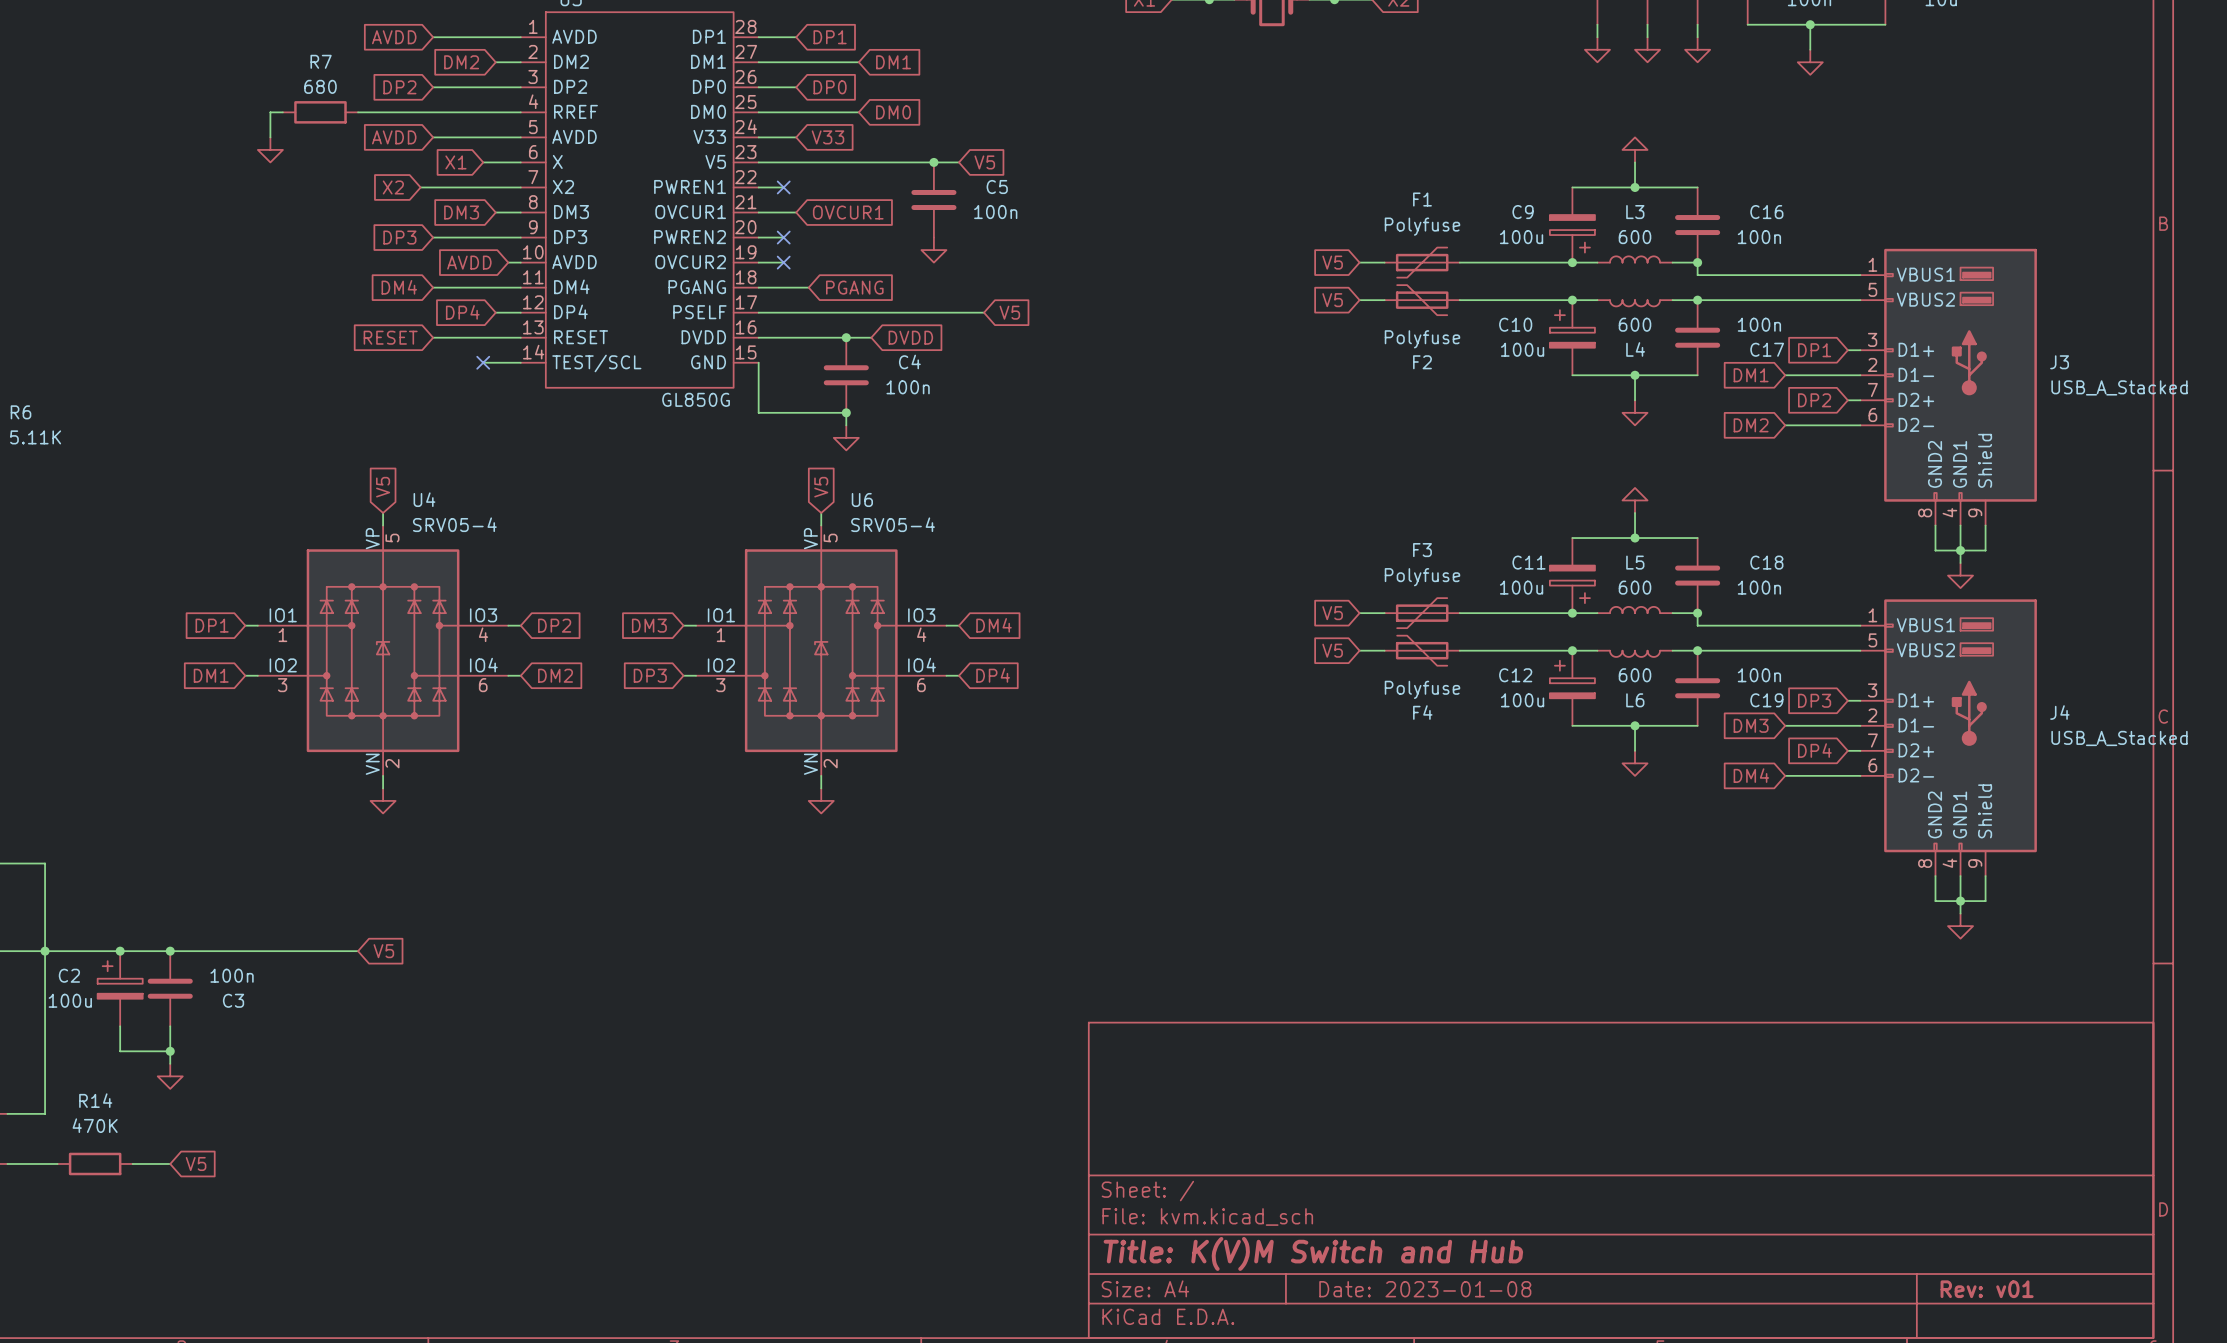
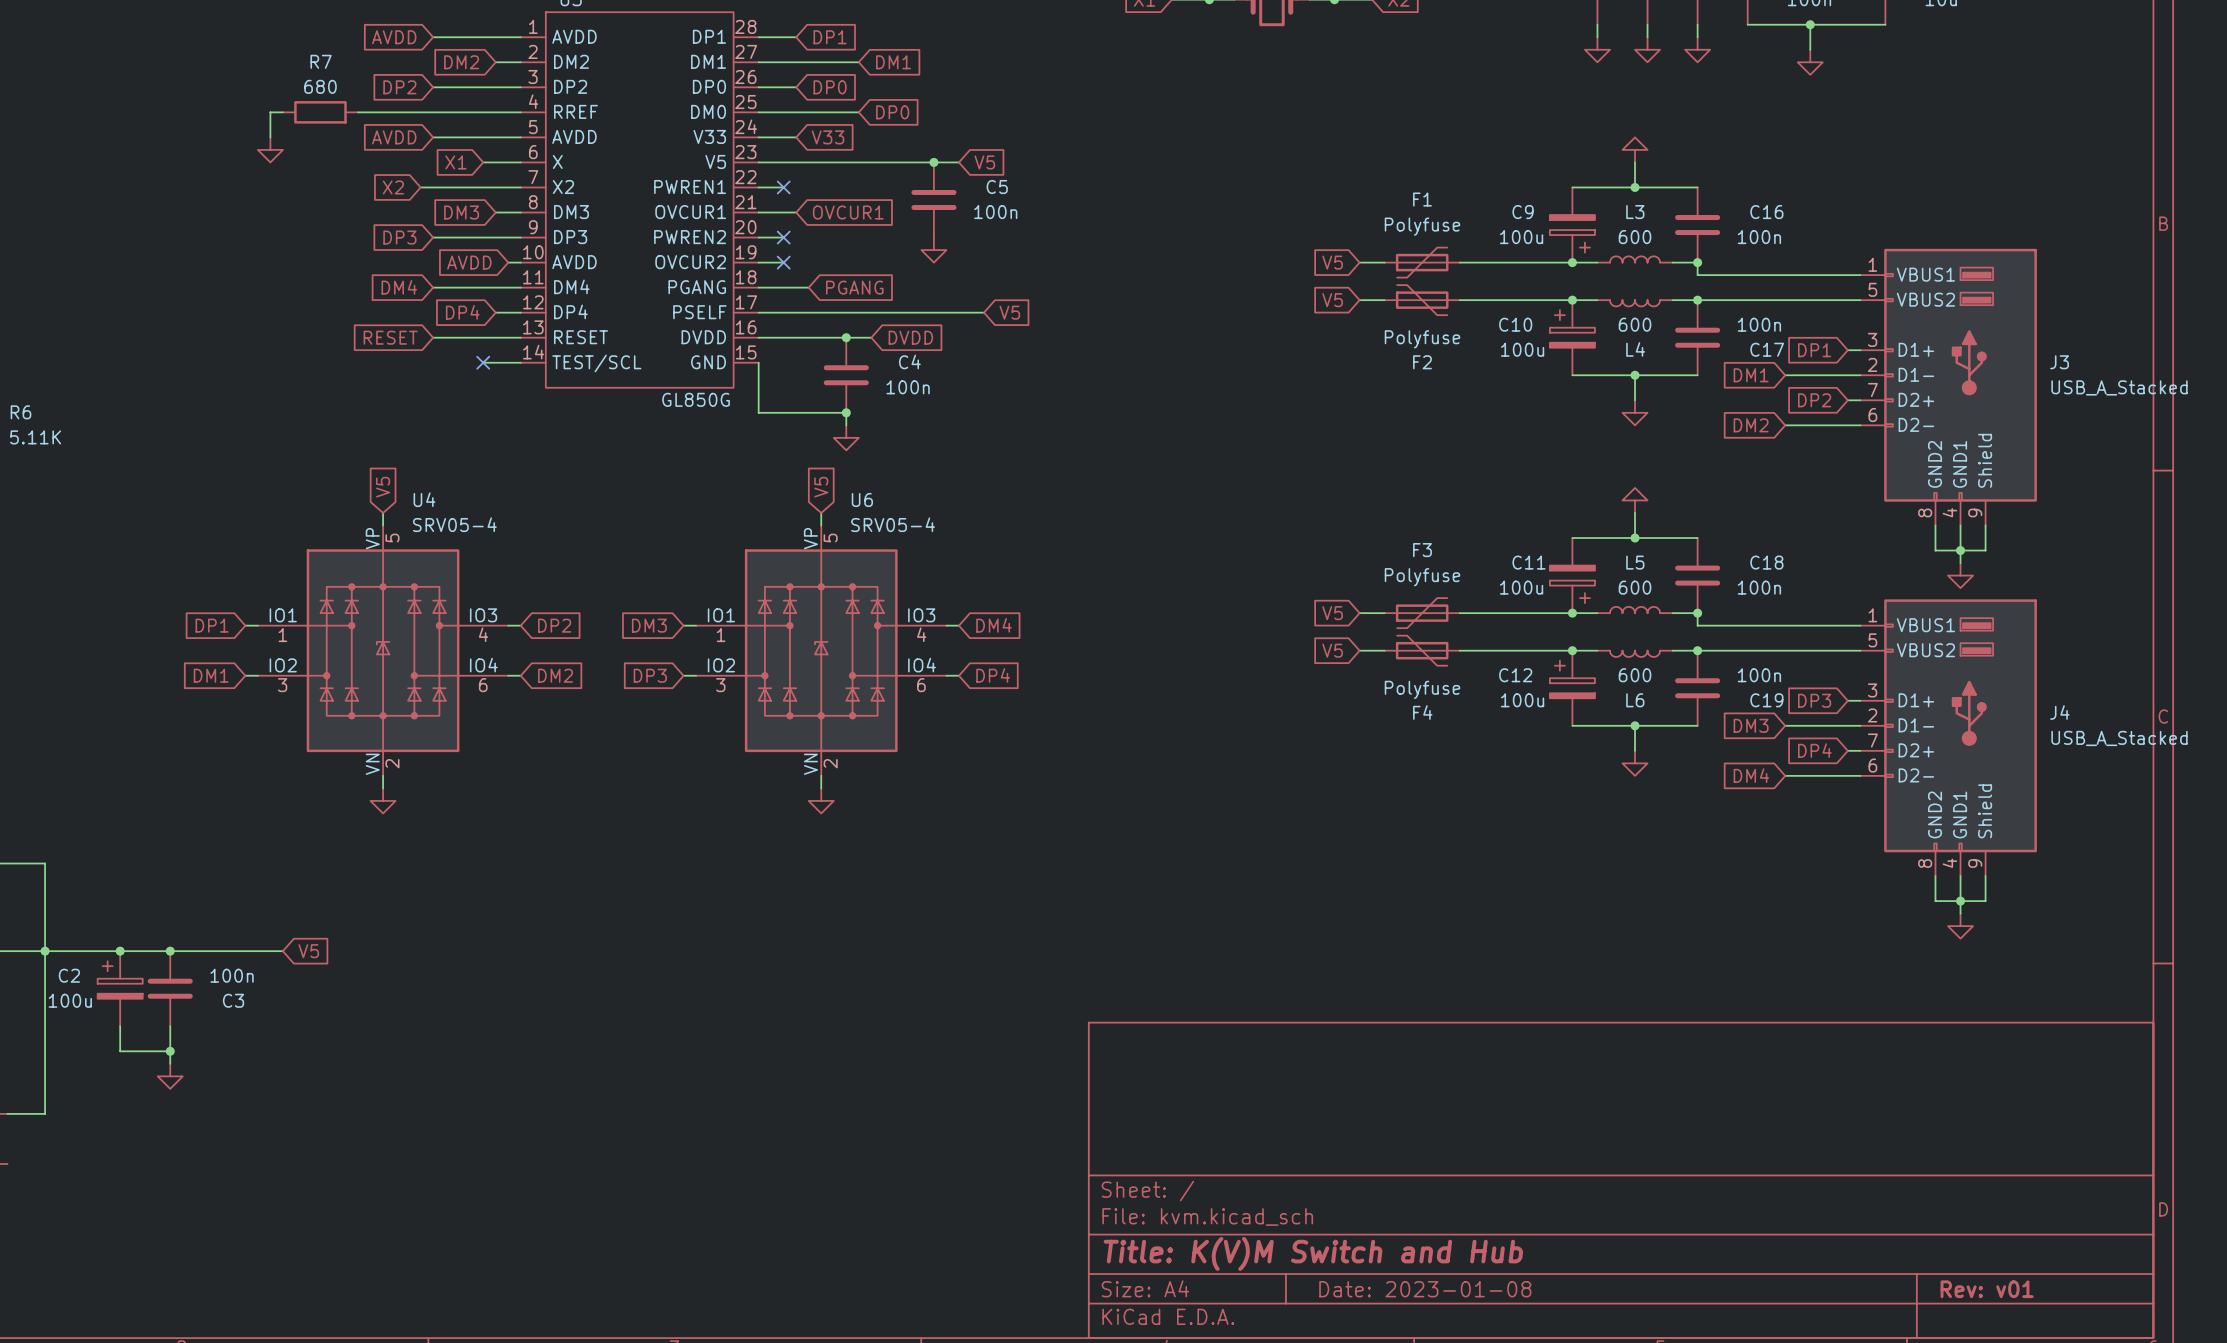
global label: DM0 (893, 112) -> DP0 (892, 112)
wire: (282, 951) (358, 951) -> none
global label position: V5 (383, 951) -> V5 (308, 951)
wire: (7, 1163) (57, 1163) -> none
R14: 470K (95, 1163) -> none
wire: (132, 1163) (170, 1163) -> none
global label: V5 (196, 1163) -> none

